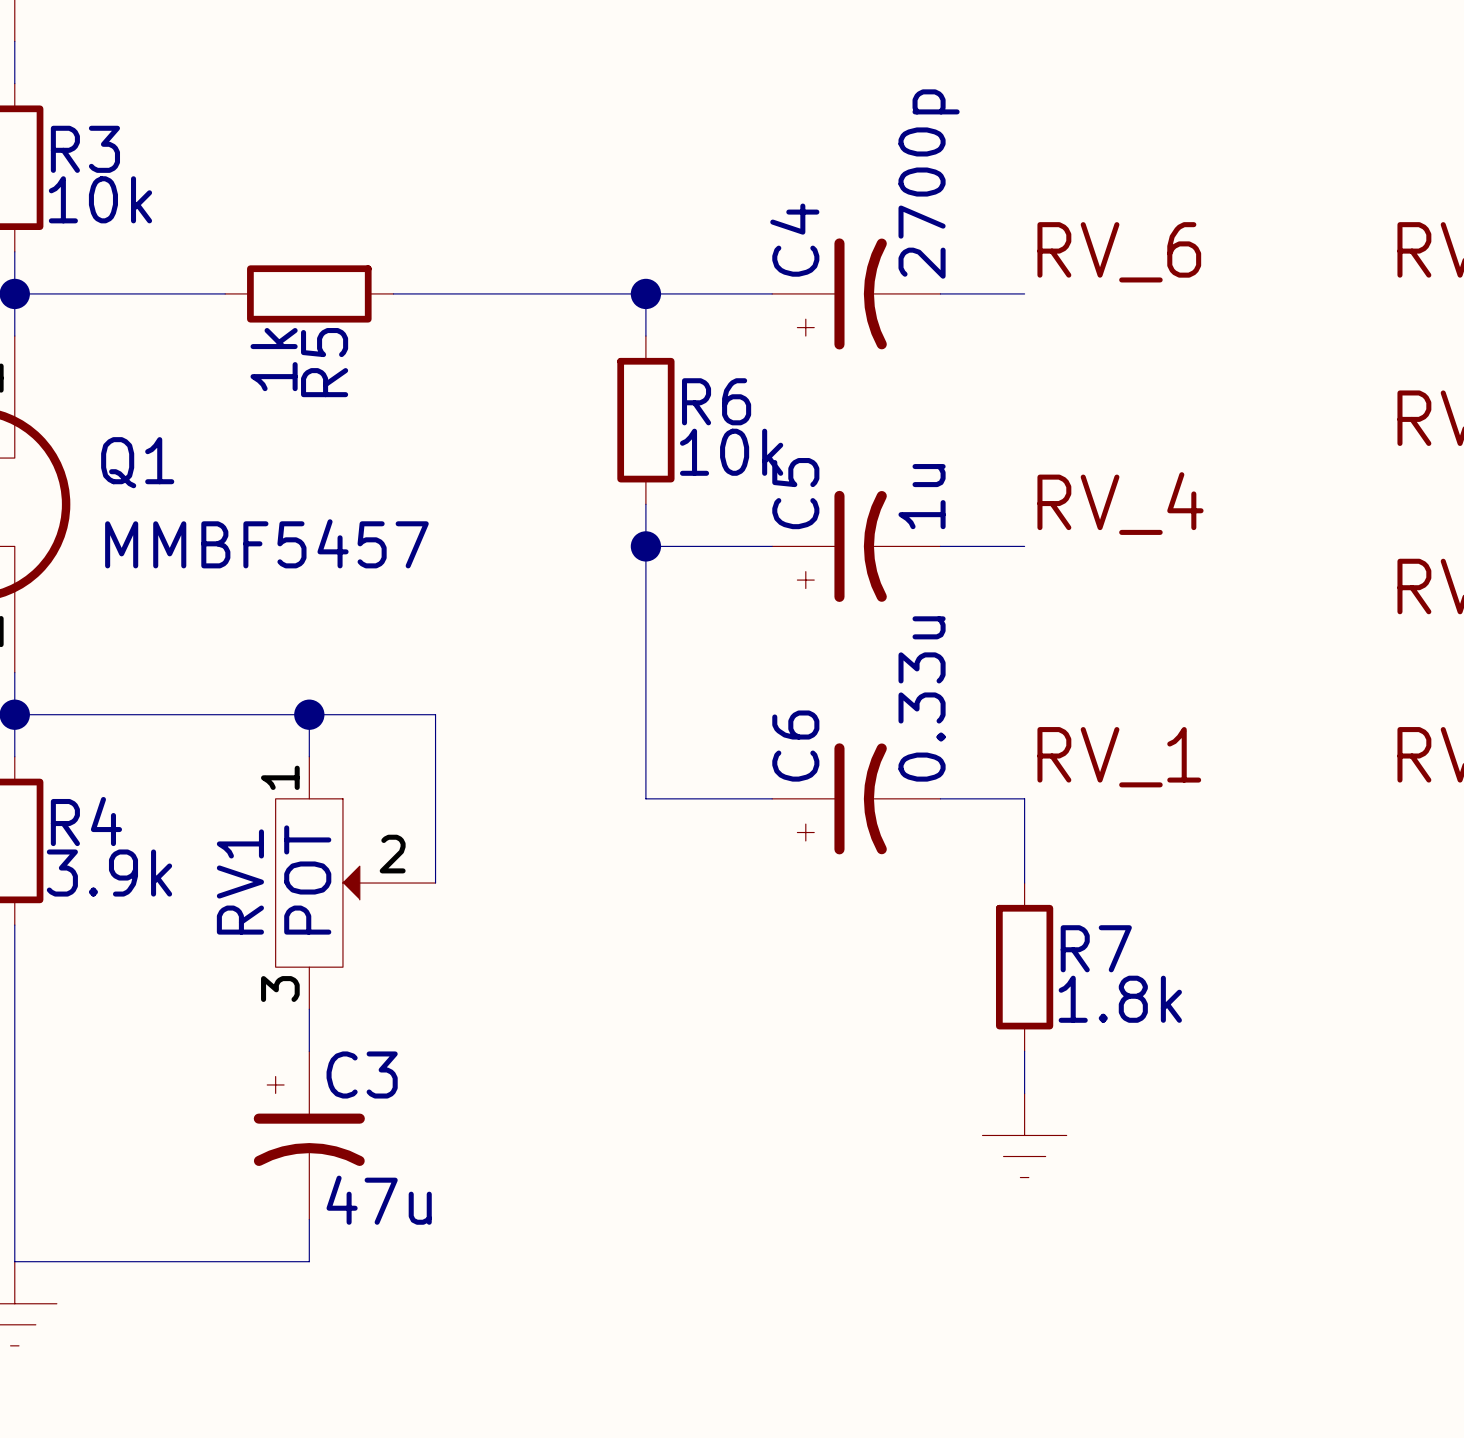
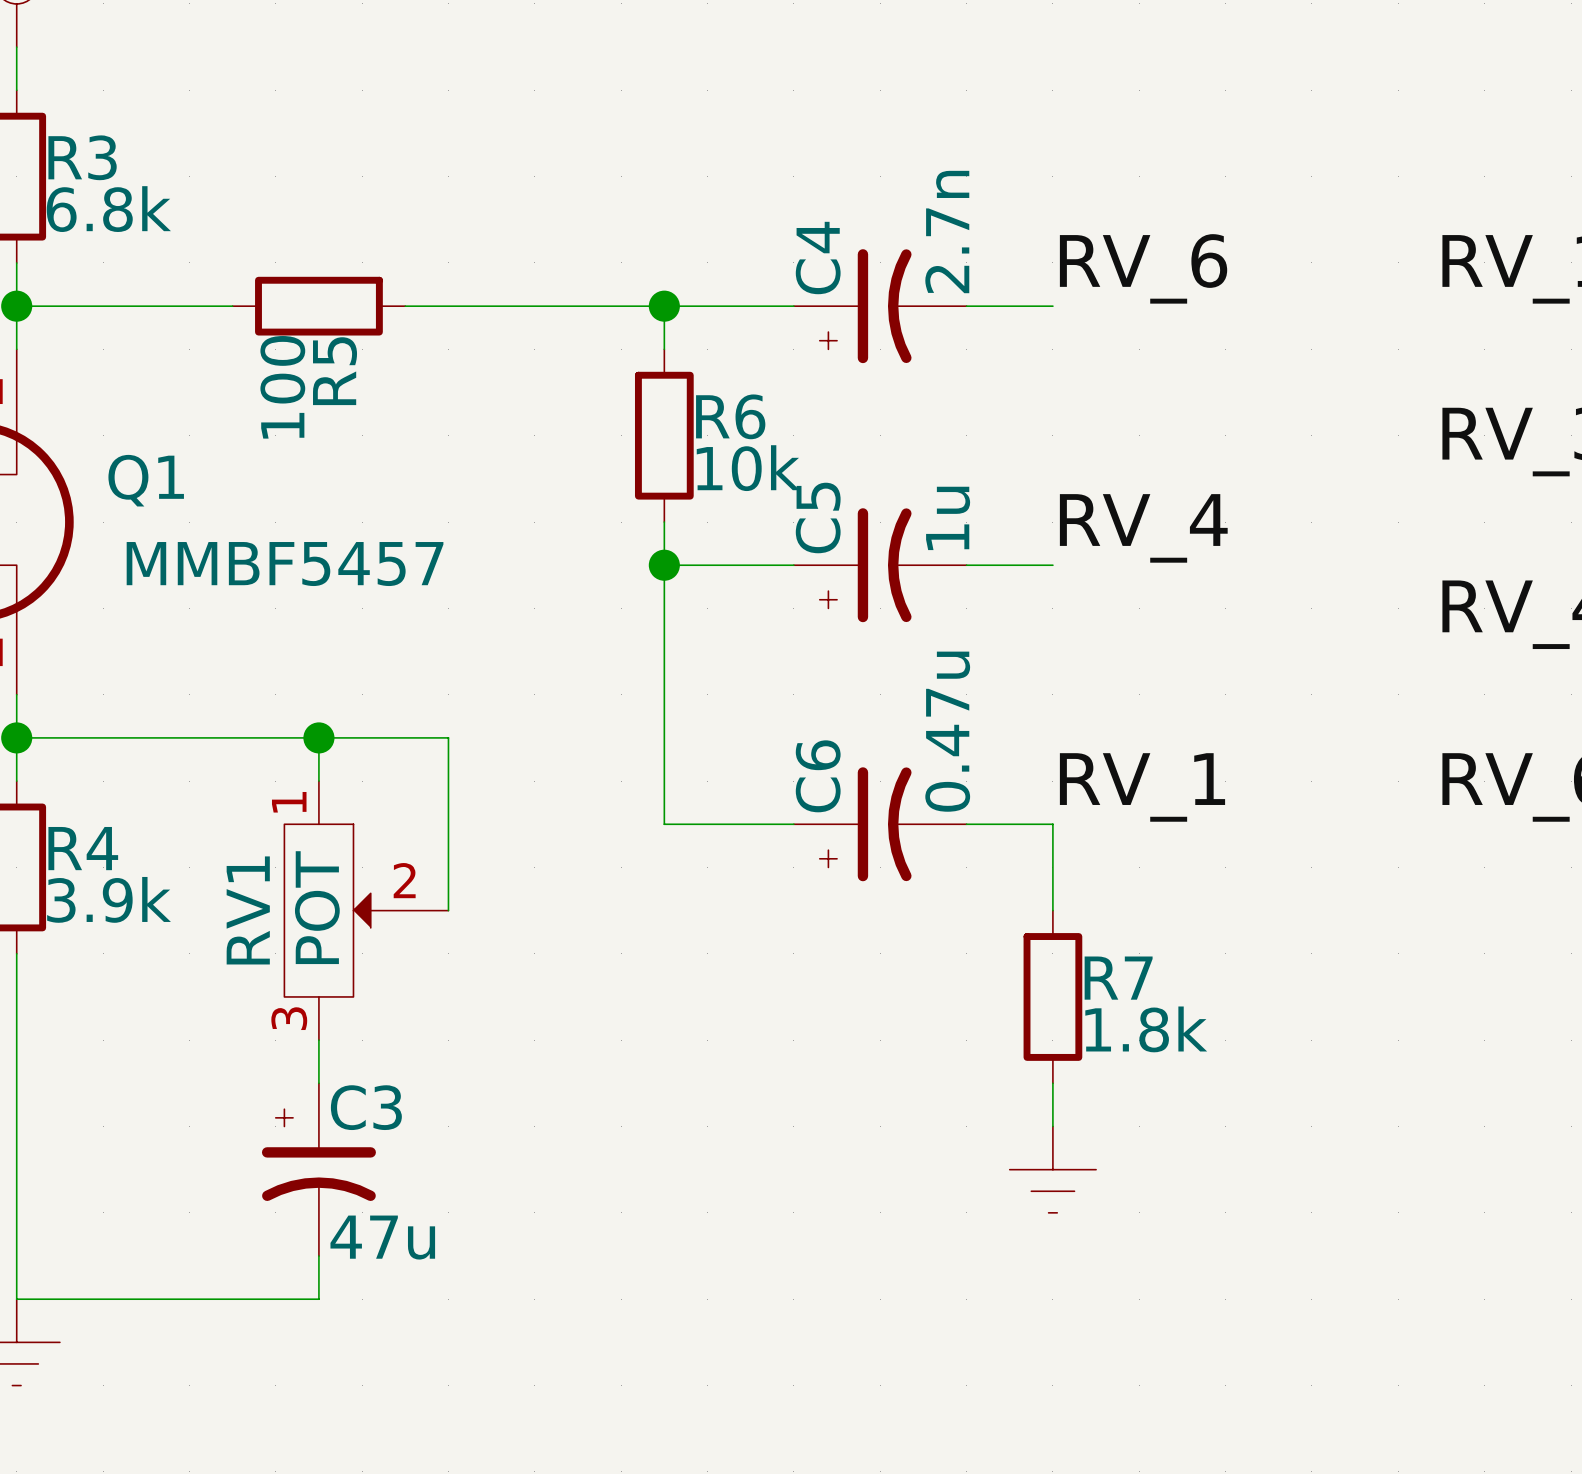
C4 value: 2700p (929, 184) -> 2.7n (947, 232)
R3 value: 10k (100, 199) -> 6.8k (108, 209)
R5 value: 1k (274, 359) -> 100 (282, 387)
C6 value: 0.33u (922, 698) -> 0.47u (947, 731)

